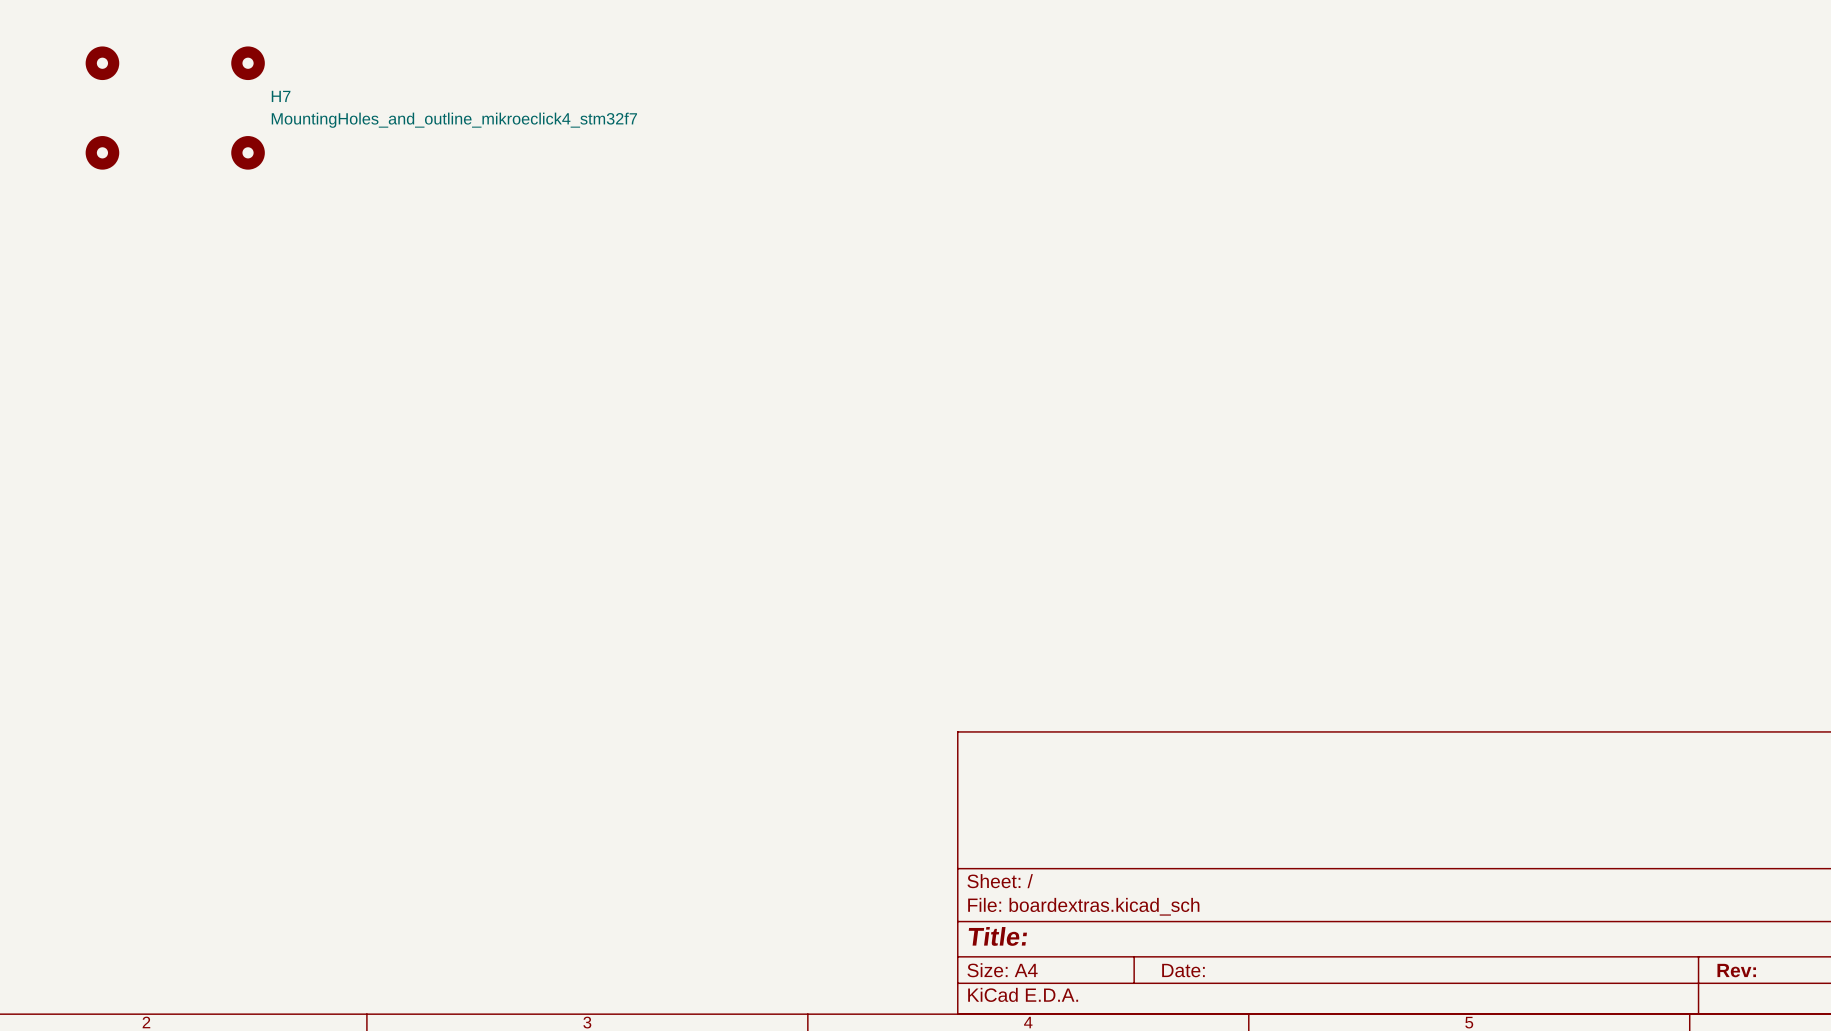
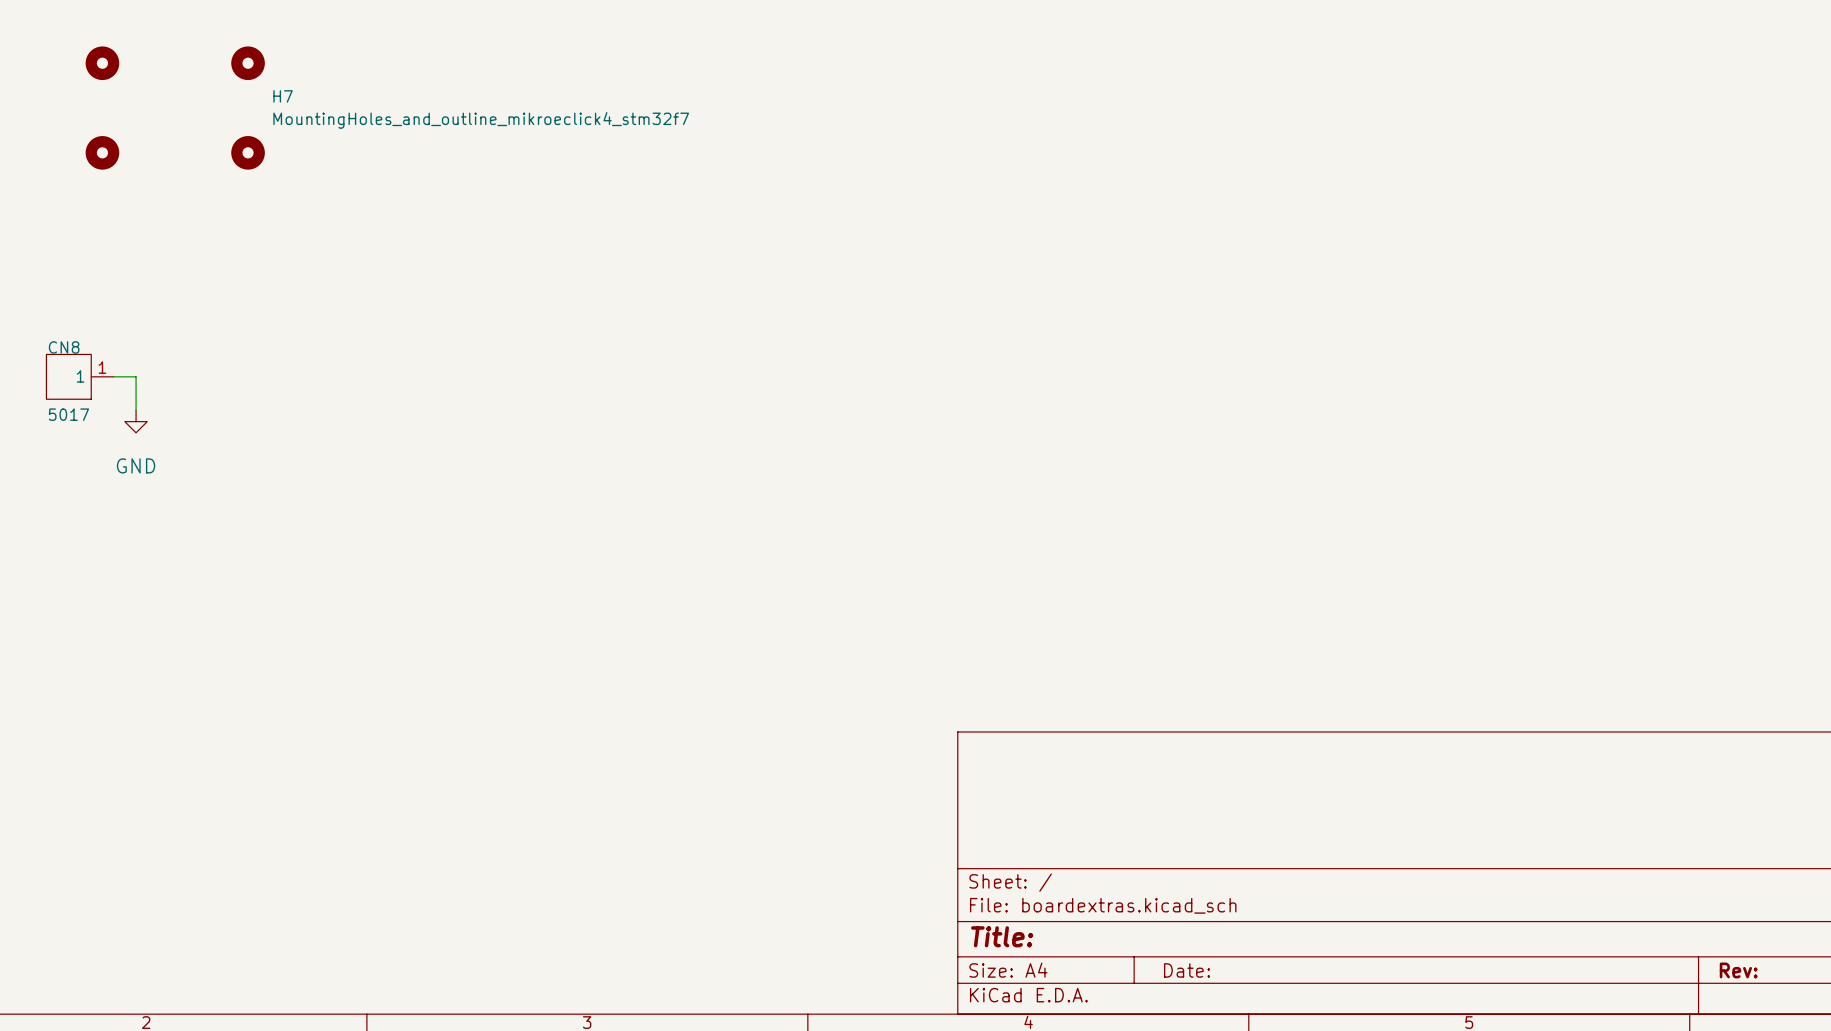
CN8: none -> 5017 (80, 376)
wire: none -> (113, 376) (136, 376) (136, 410)
power symbol: none -> GND (136, 421)

